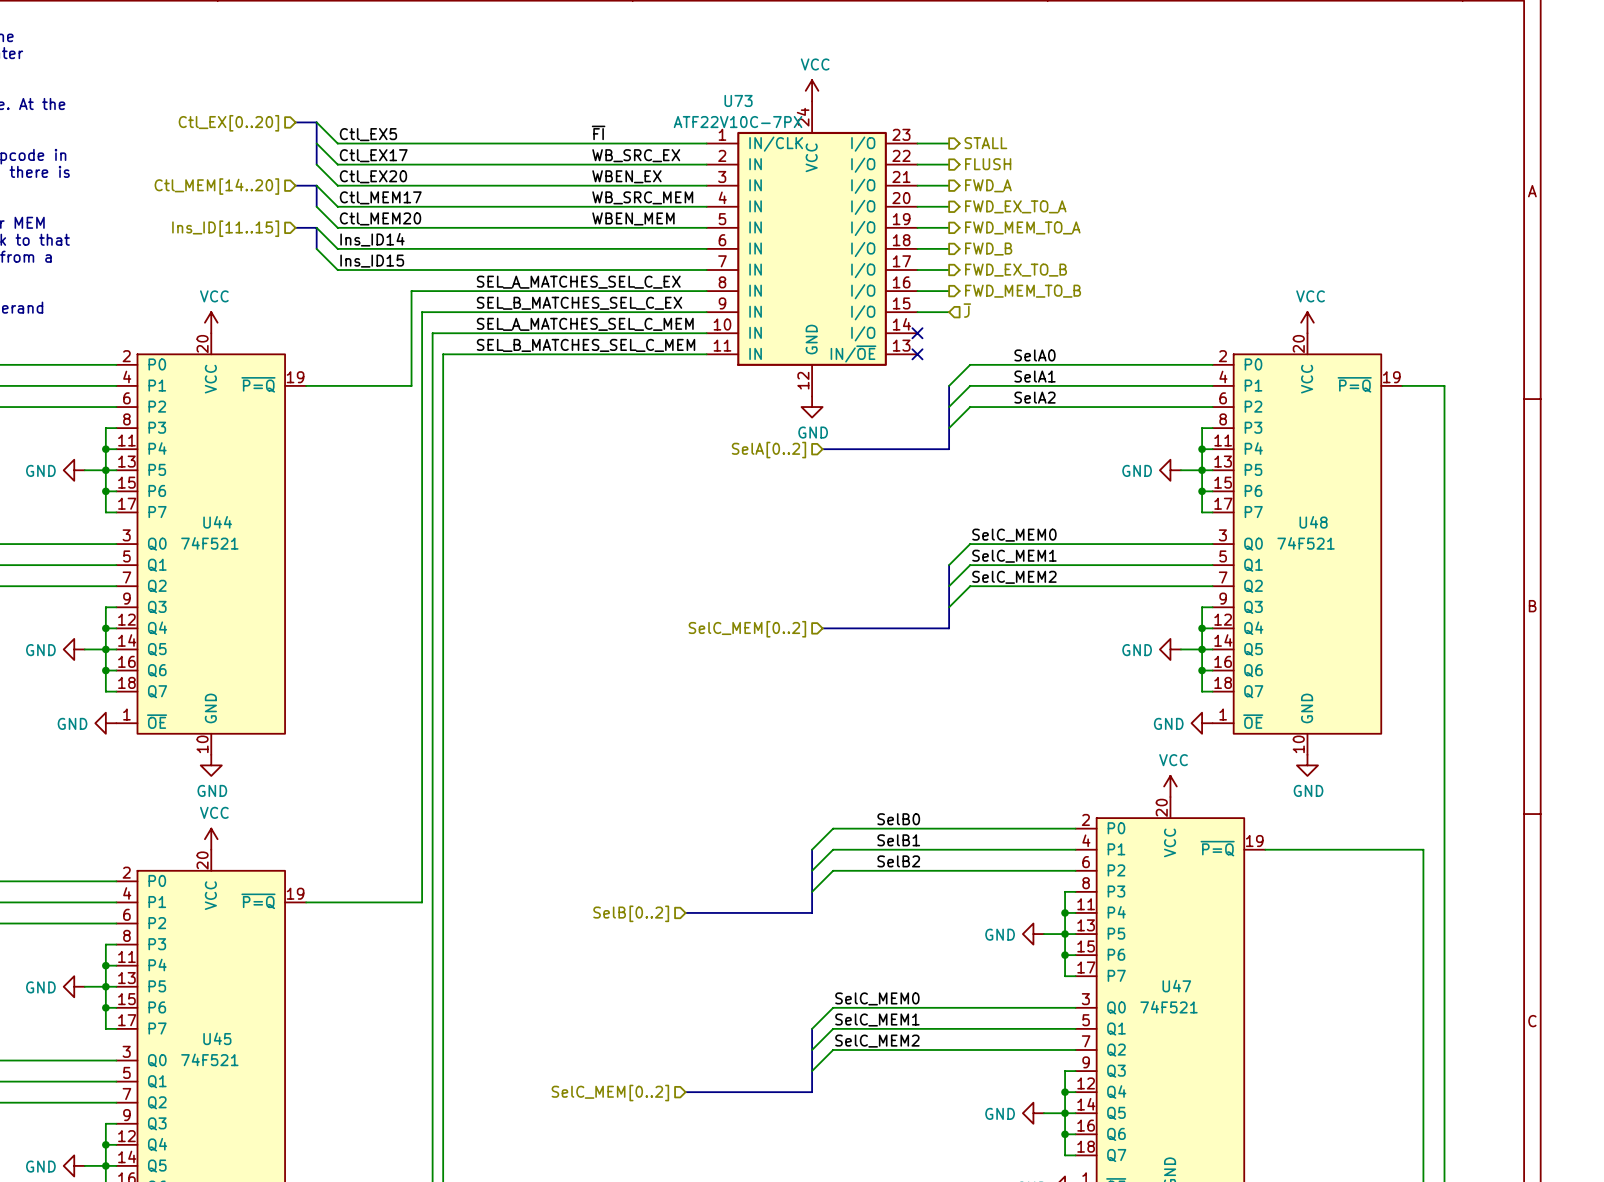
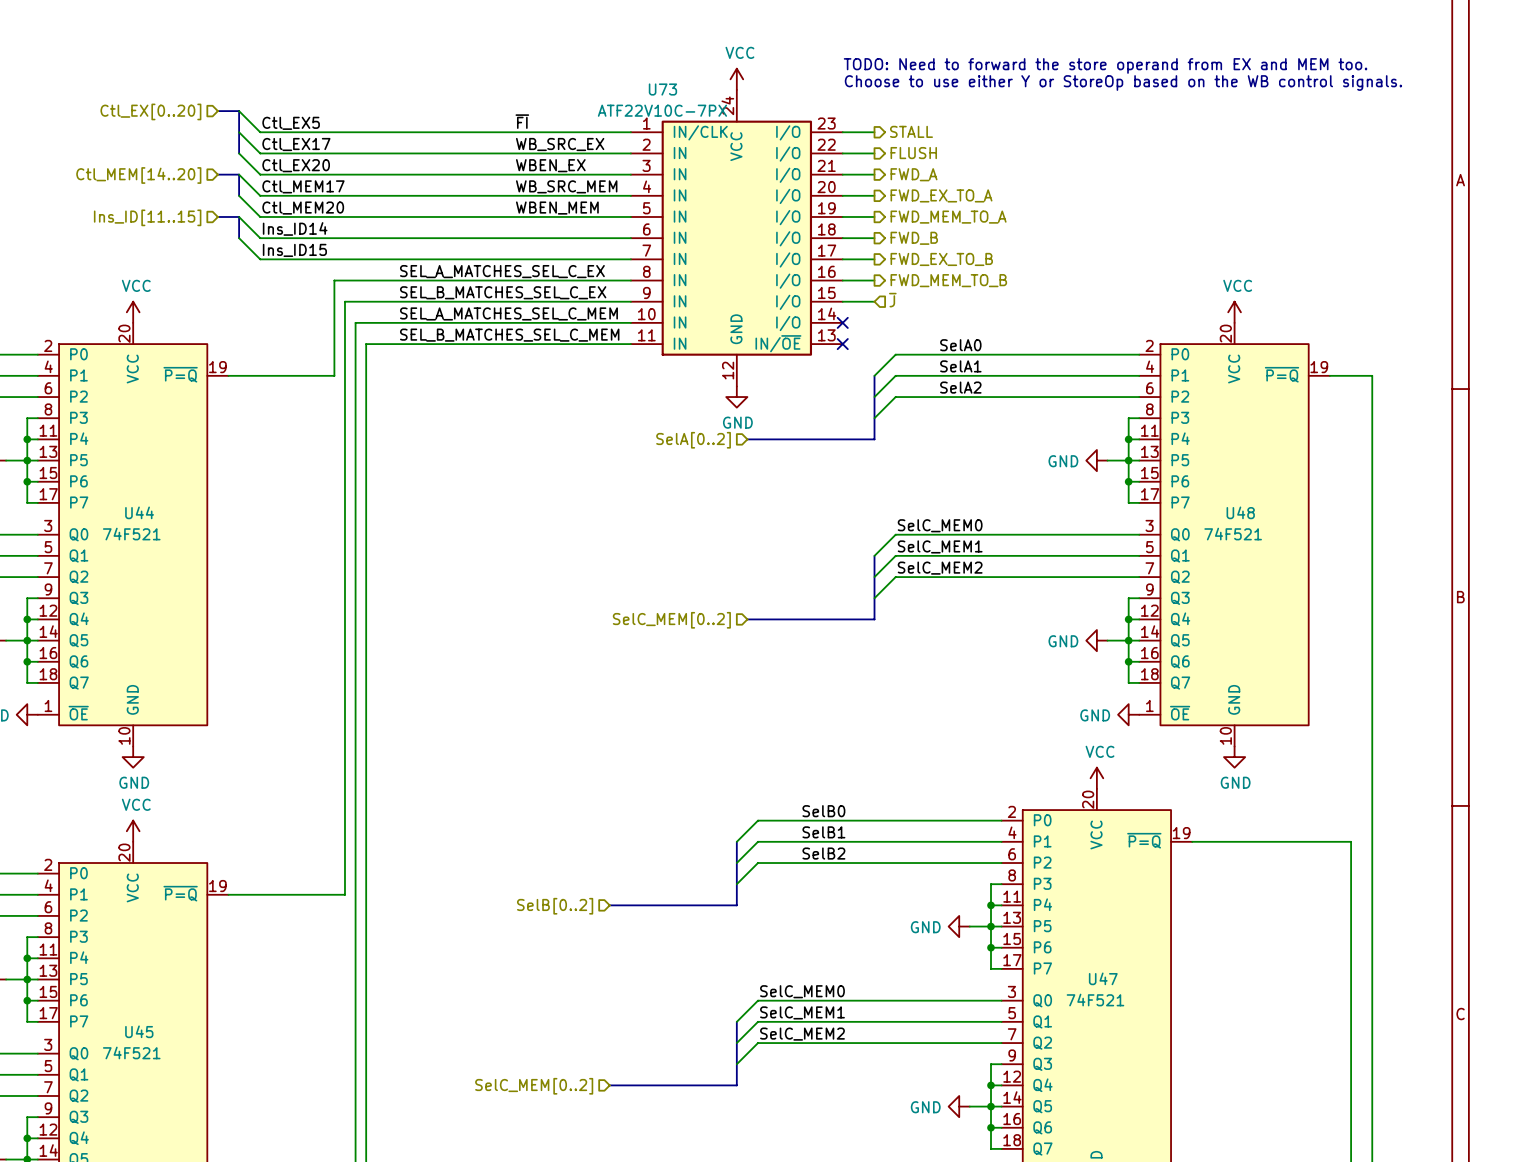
text: none -> TODO: Need to forward the store operand from EX and MEM too. (1105, 65)
text: none -> Choose to use either Y or StoreOp based on the WB control signals. (1123, 83)

